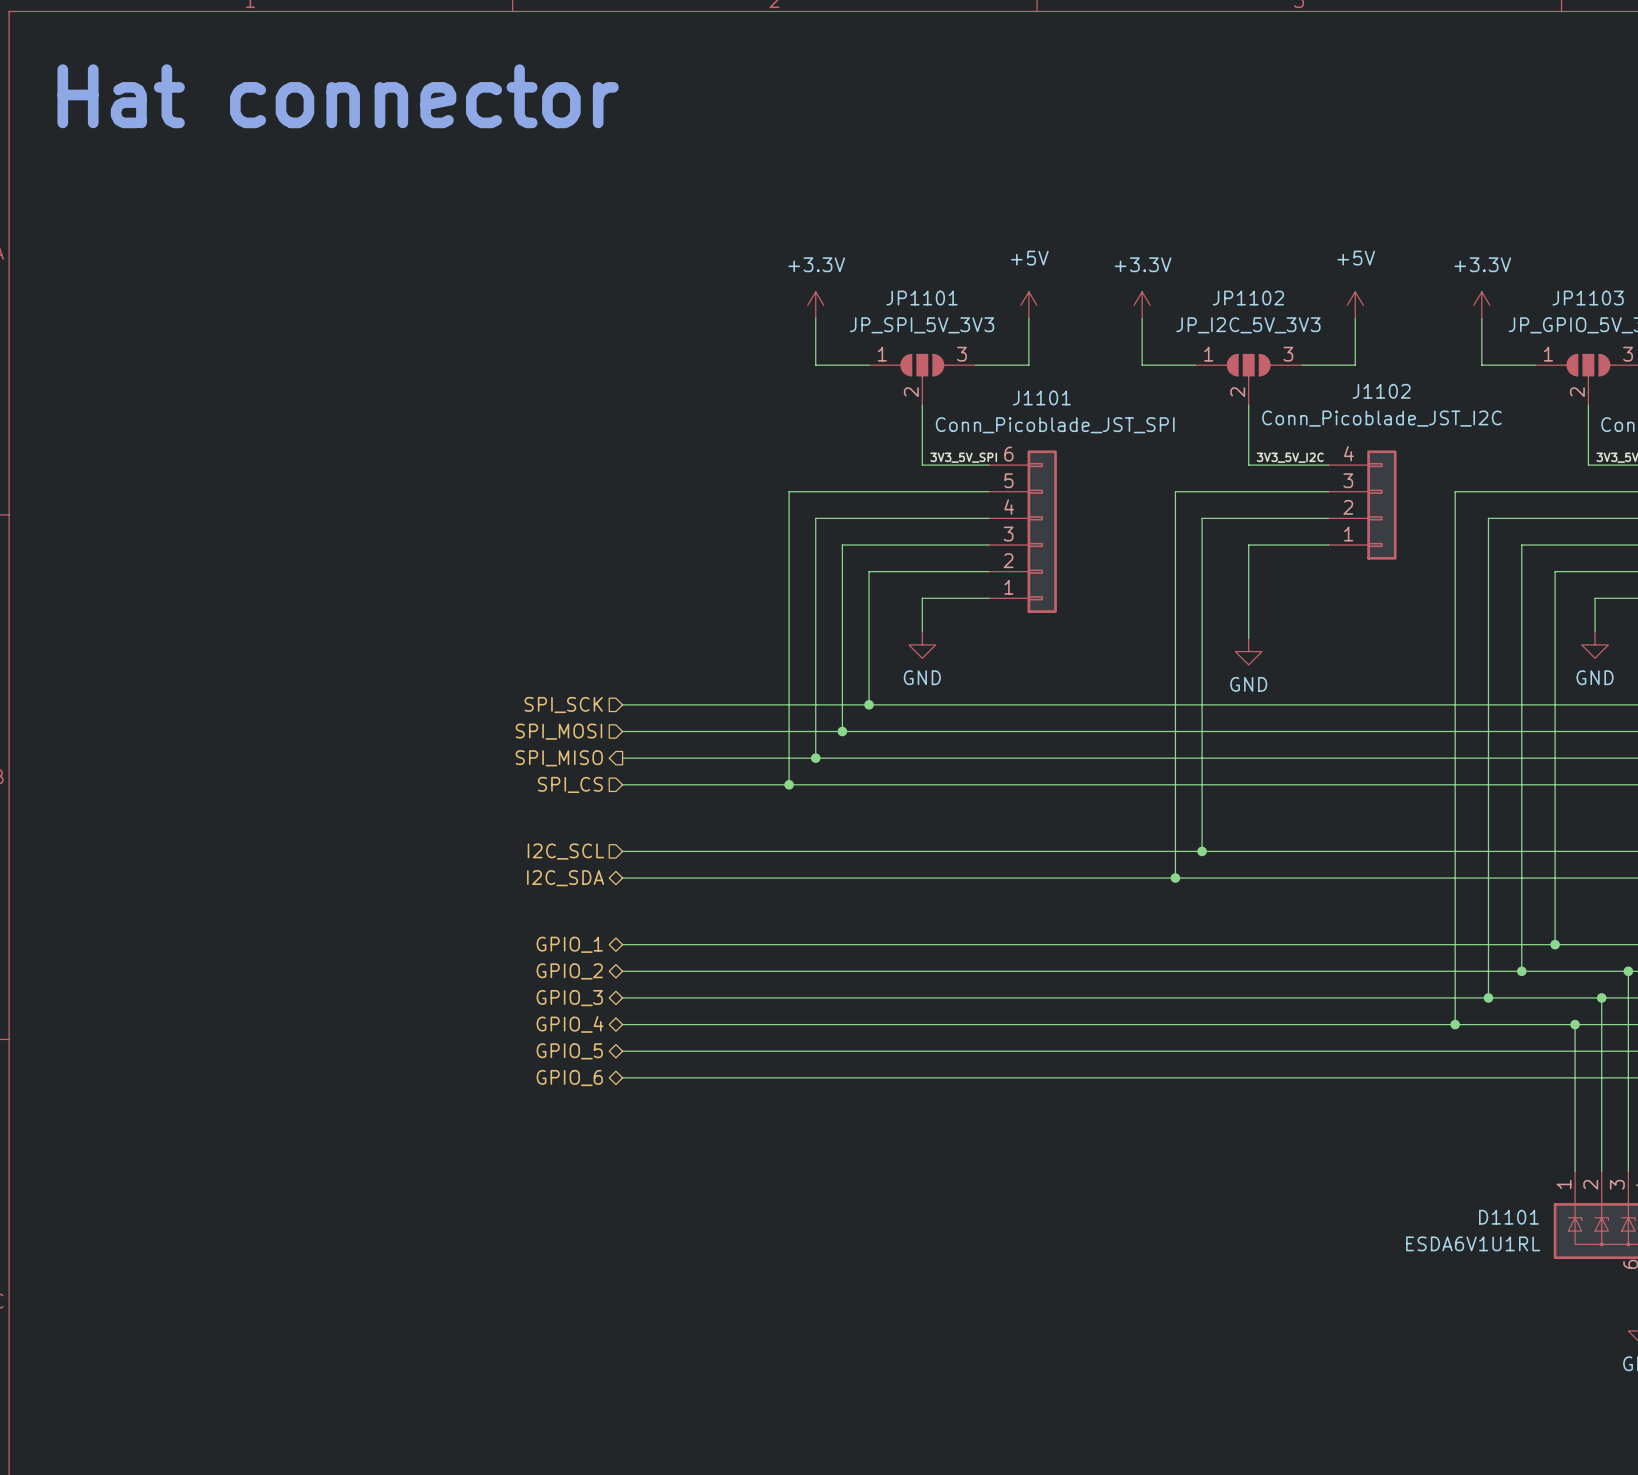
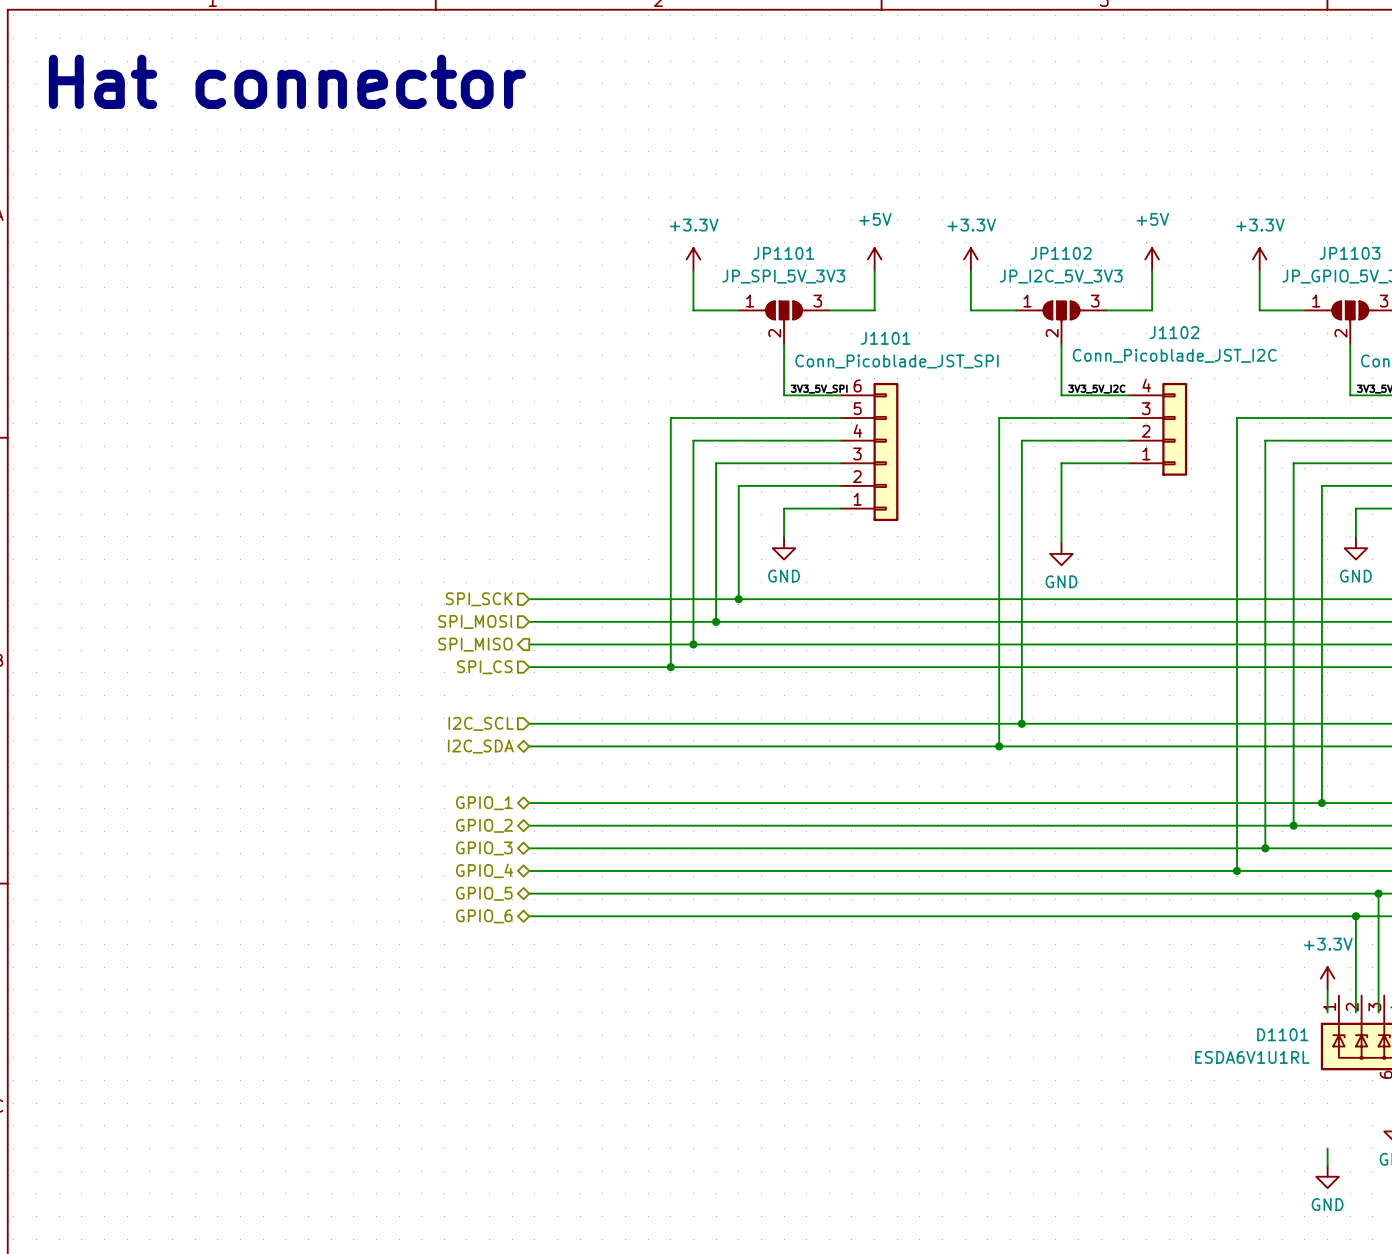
wire: (1628, 971) (1628, 1171) -> none
junction: (1628, 971) -> none
wire: (1601, 997) (1601, 1171) -> none
junction: (1601, 997) -> none
wire: (1575, 1024) (1575, 1171) -> none
junction: (1575, 1024) -> none
wire: none -> (1378, 893) (1378, 1012)
junction: none -> (1378, 893)
wire: none -> (1355, 916) (1355, 1012)
junction: none -> (1355, 916)
power symbol: none -> +3.3V (1327, 978)
wire: none -> (1327, 989) (1327, 1012)
wire: none -> (1327, 1148) (1327, 1165)
power symbol: none -> GND (1327, 1176)

